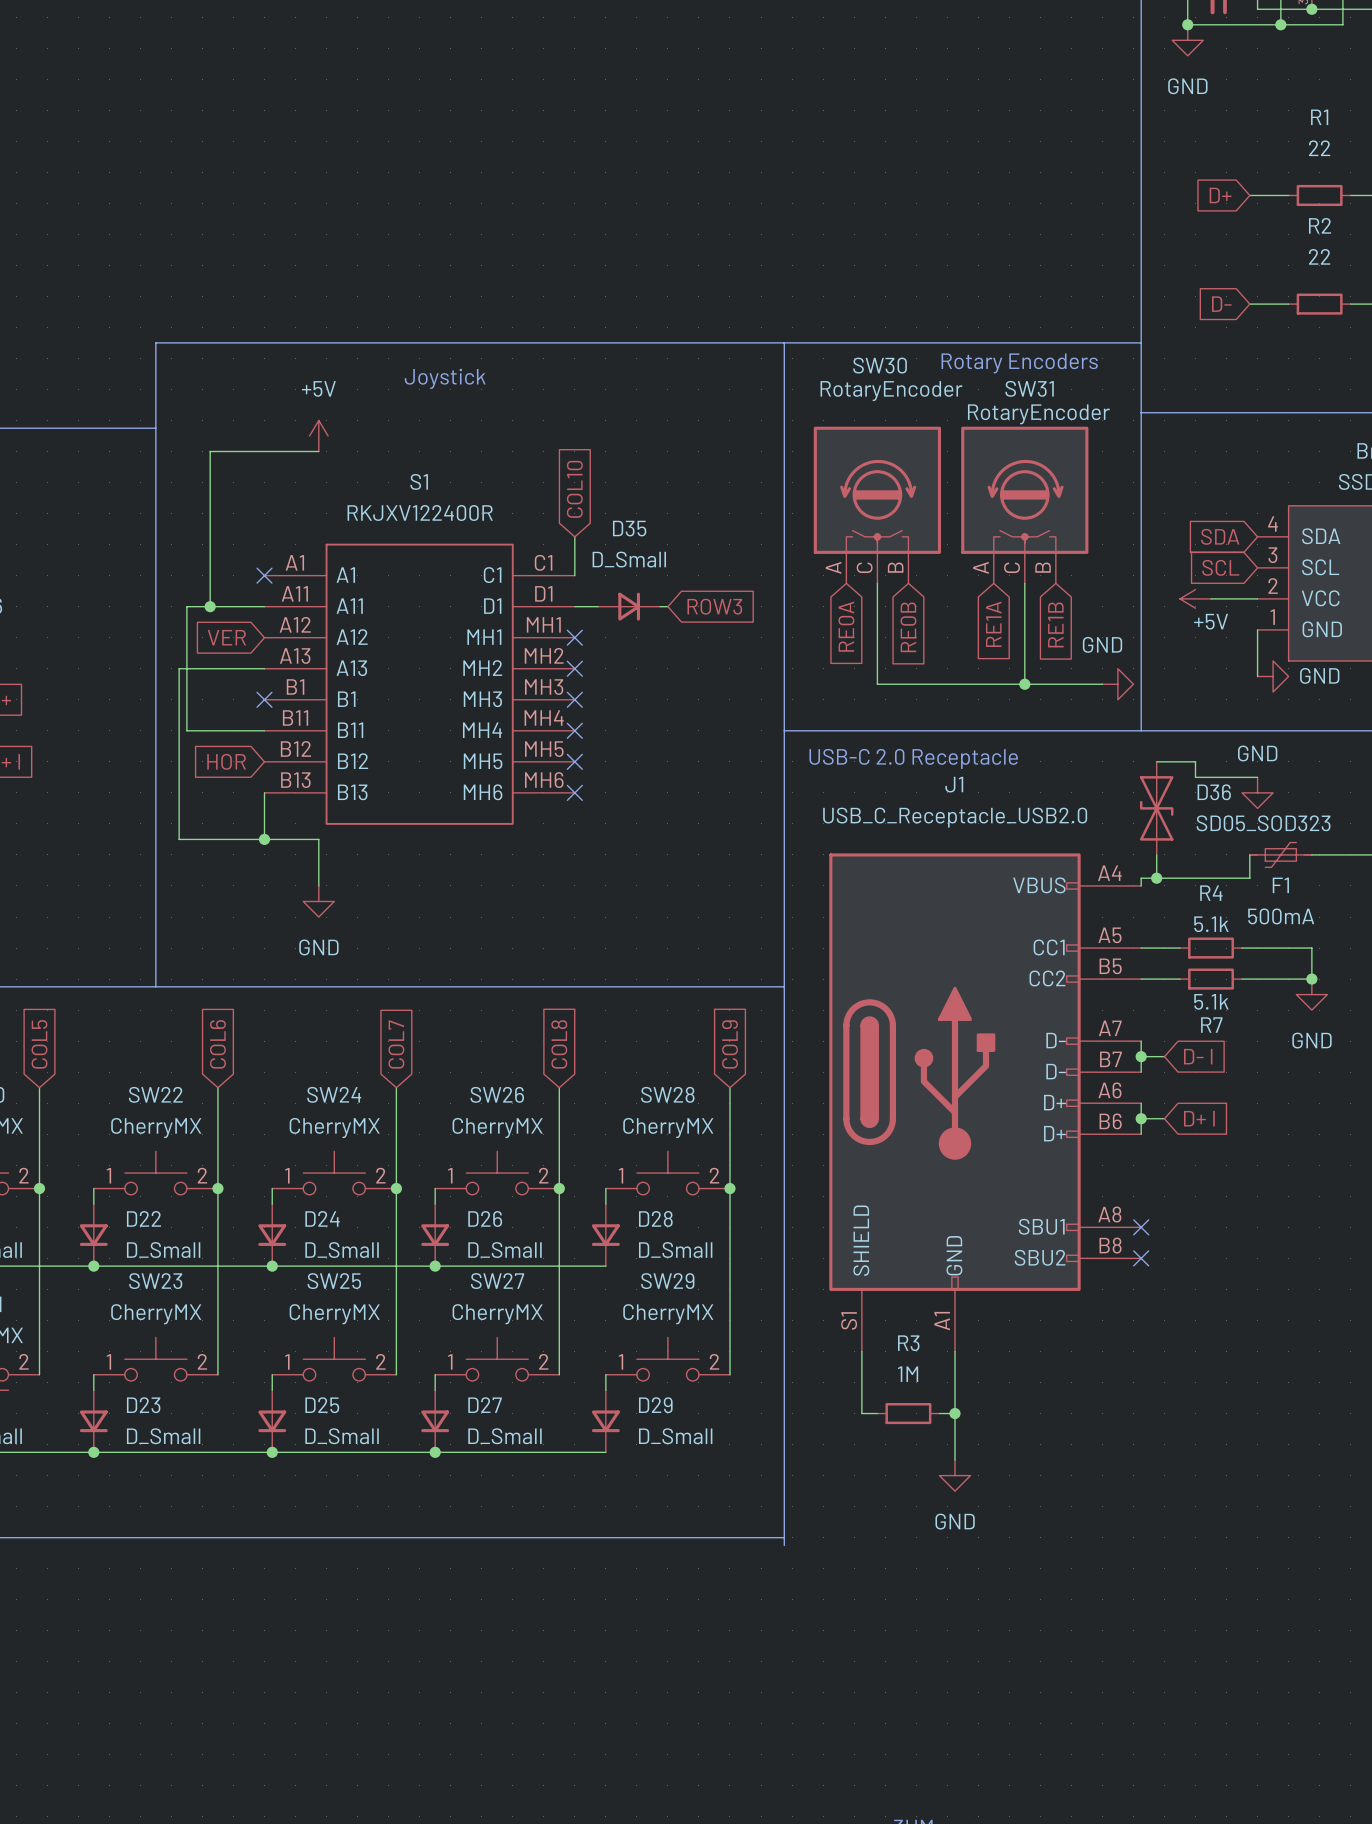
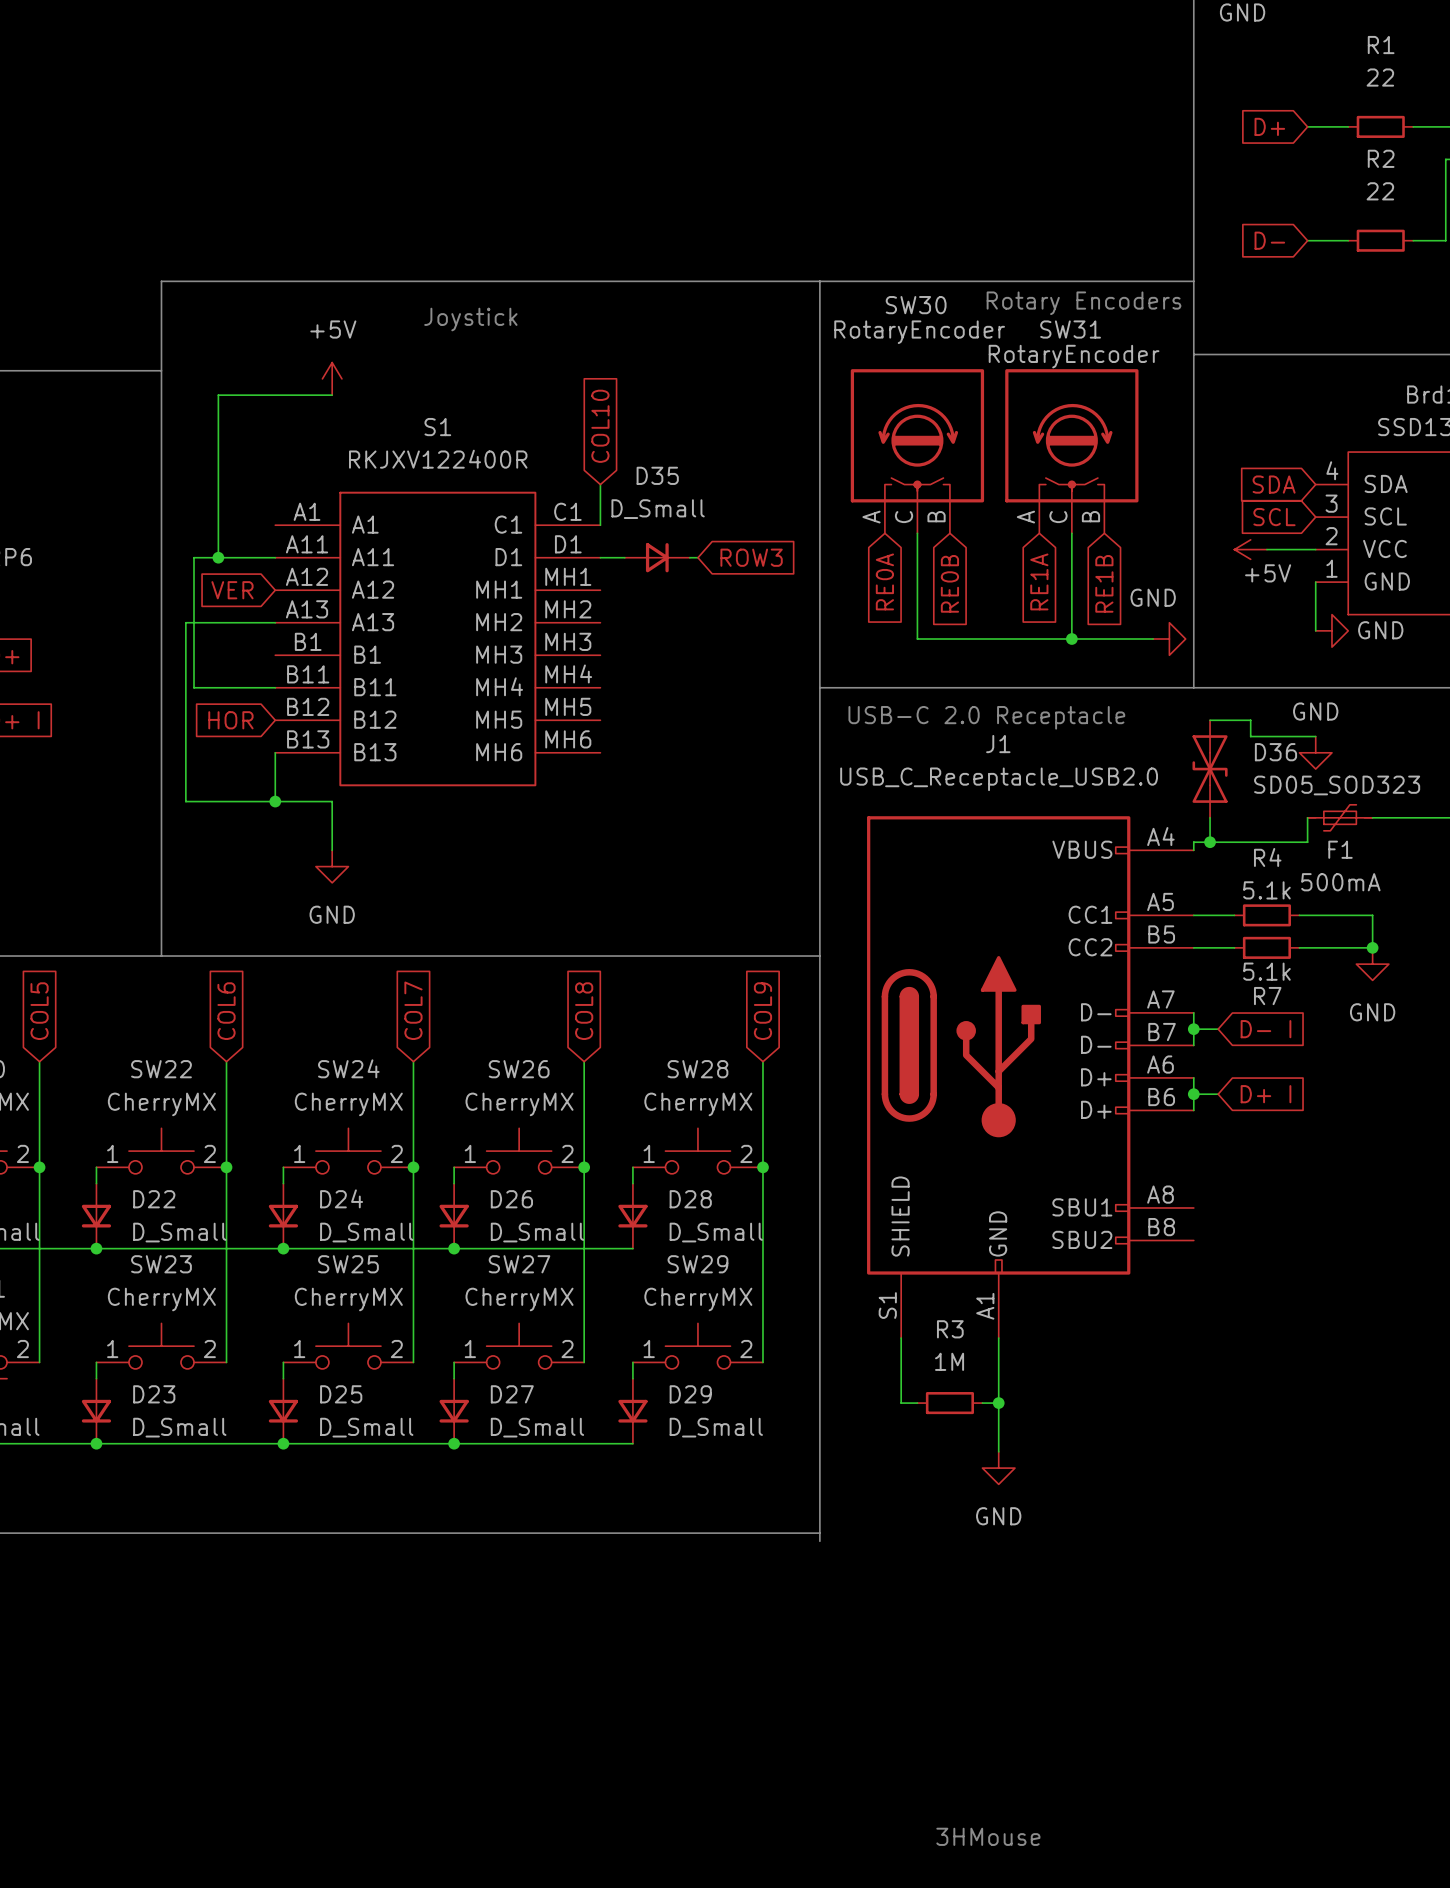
no-connect mark: (264, 575) -> none
no-connect mark: (574, 637) -> none
no-connect mark: (574, 668) -> none
no-connect mark: (264, 699) -> none
no-connect mark: (574, 699) -> none
no-connect mark: (574, 730) -> none
no-connect mark: (574, 761) -> none
no-connect mark: (574, 792) -> none
no-connect mark: (1141, 1227) -> none
no-connect mark: (1141, 1258) -> none

